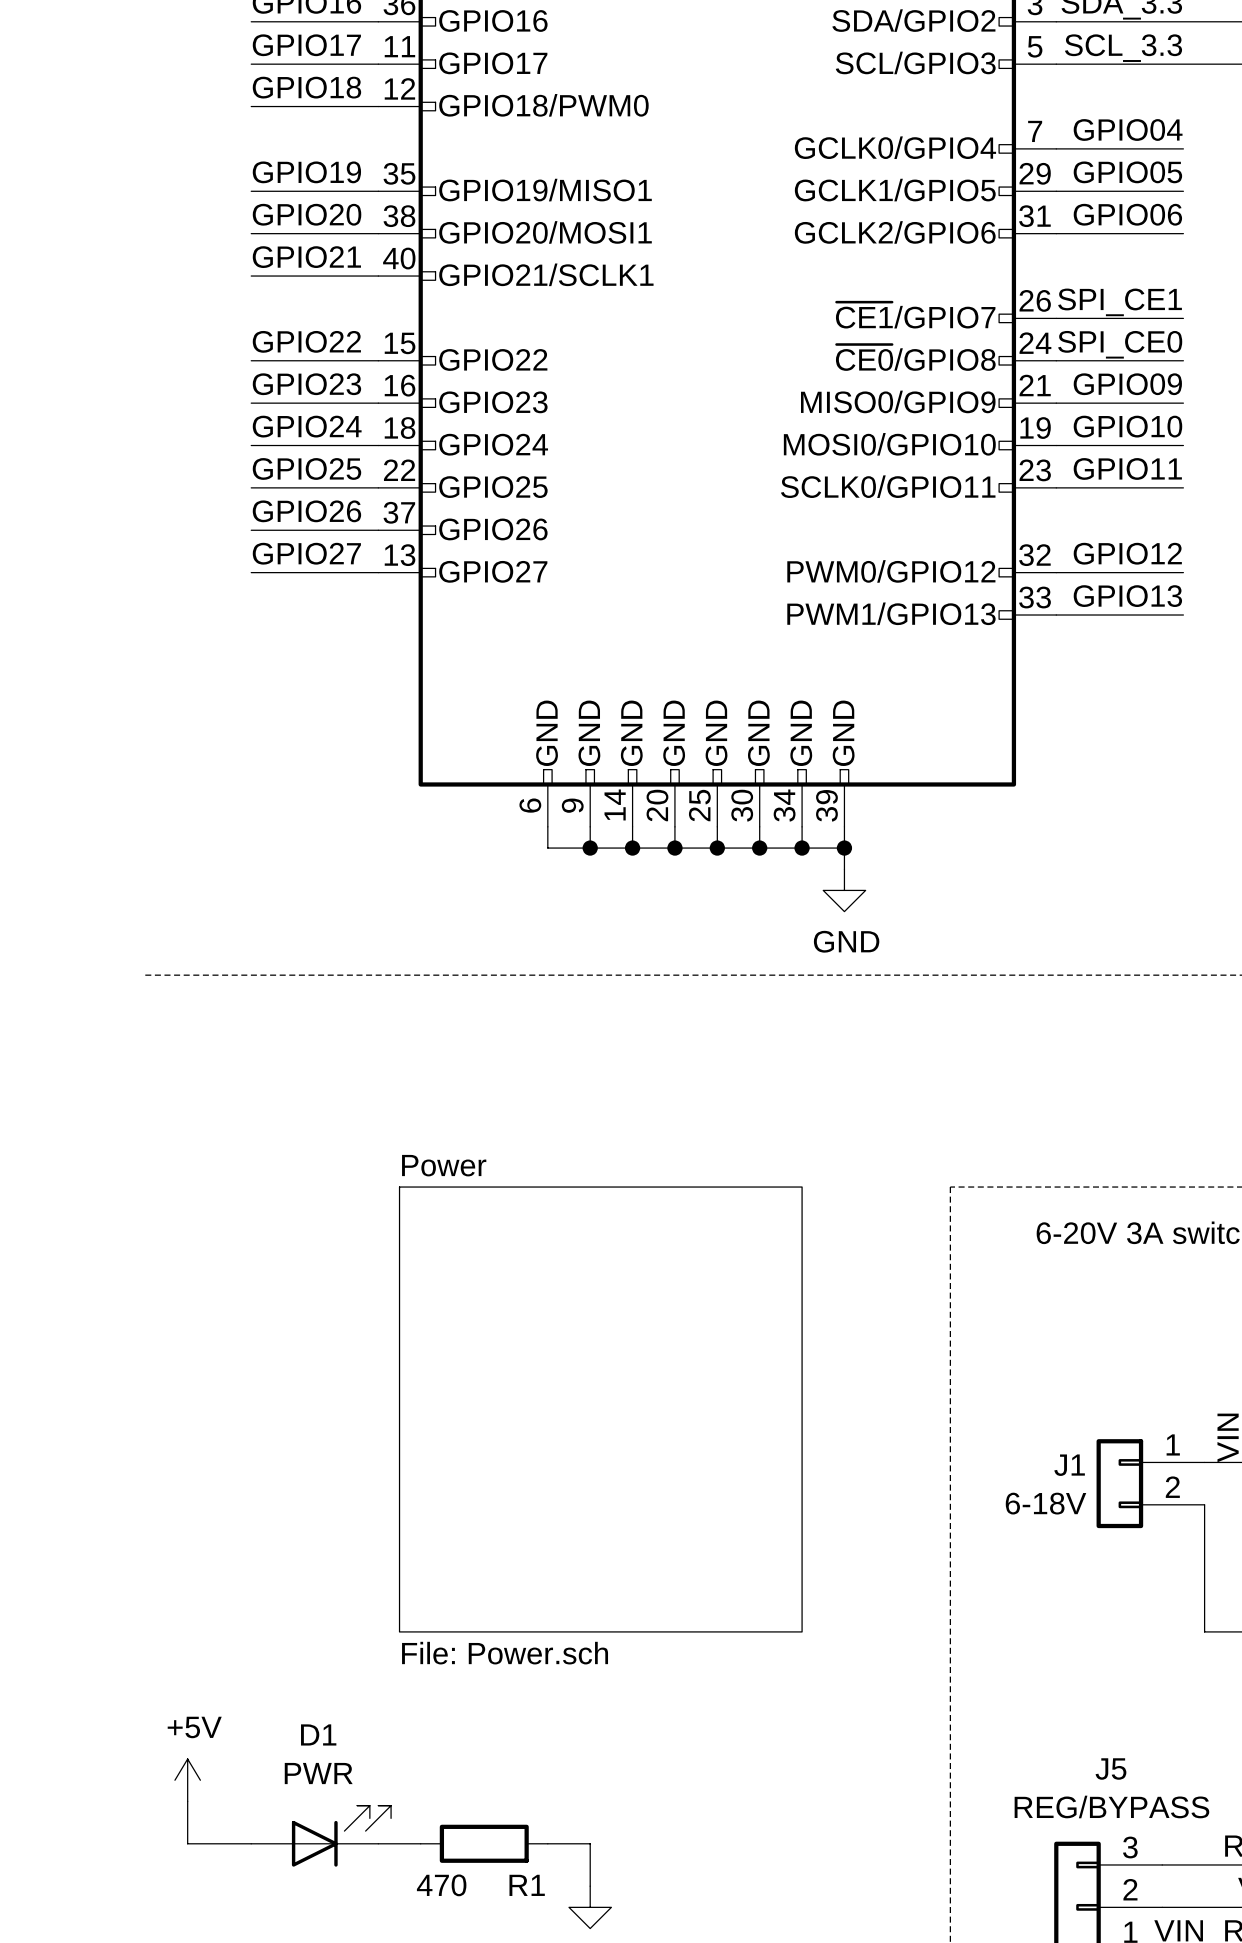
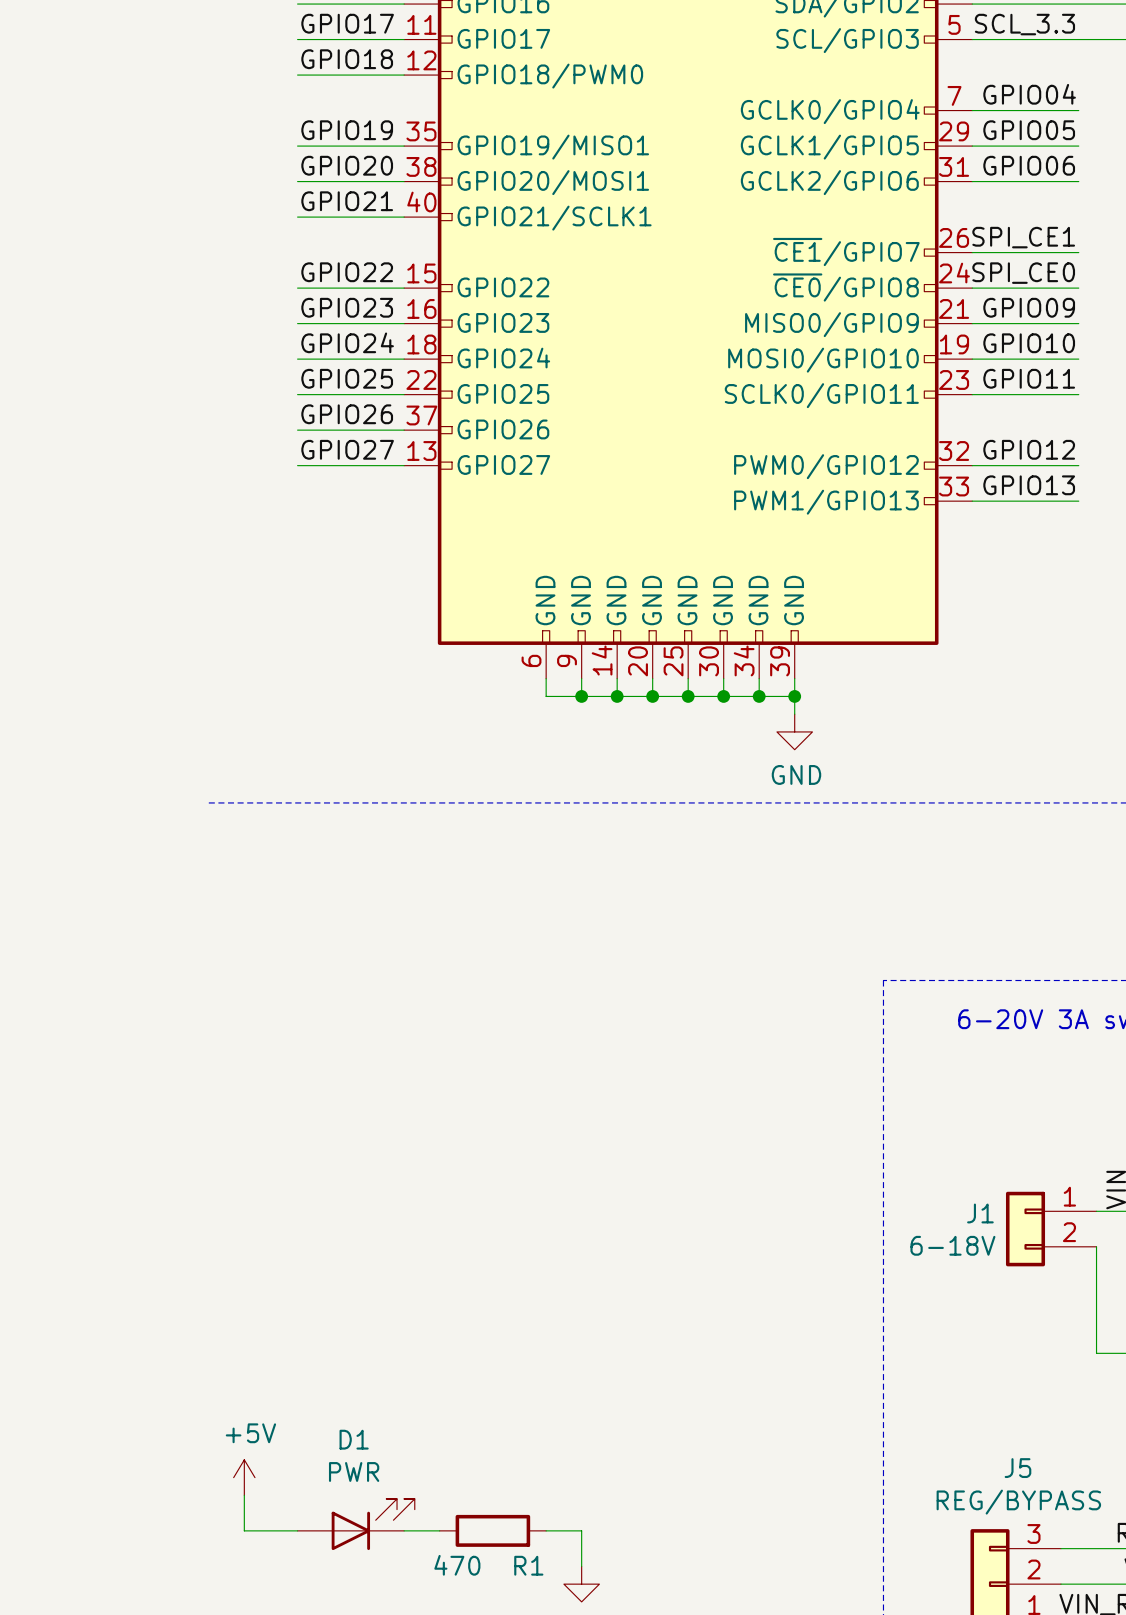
sheet Power: File: Power.sch (600, 1409) -> none

